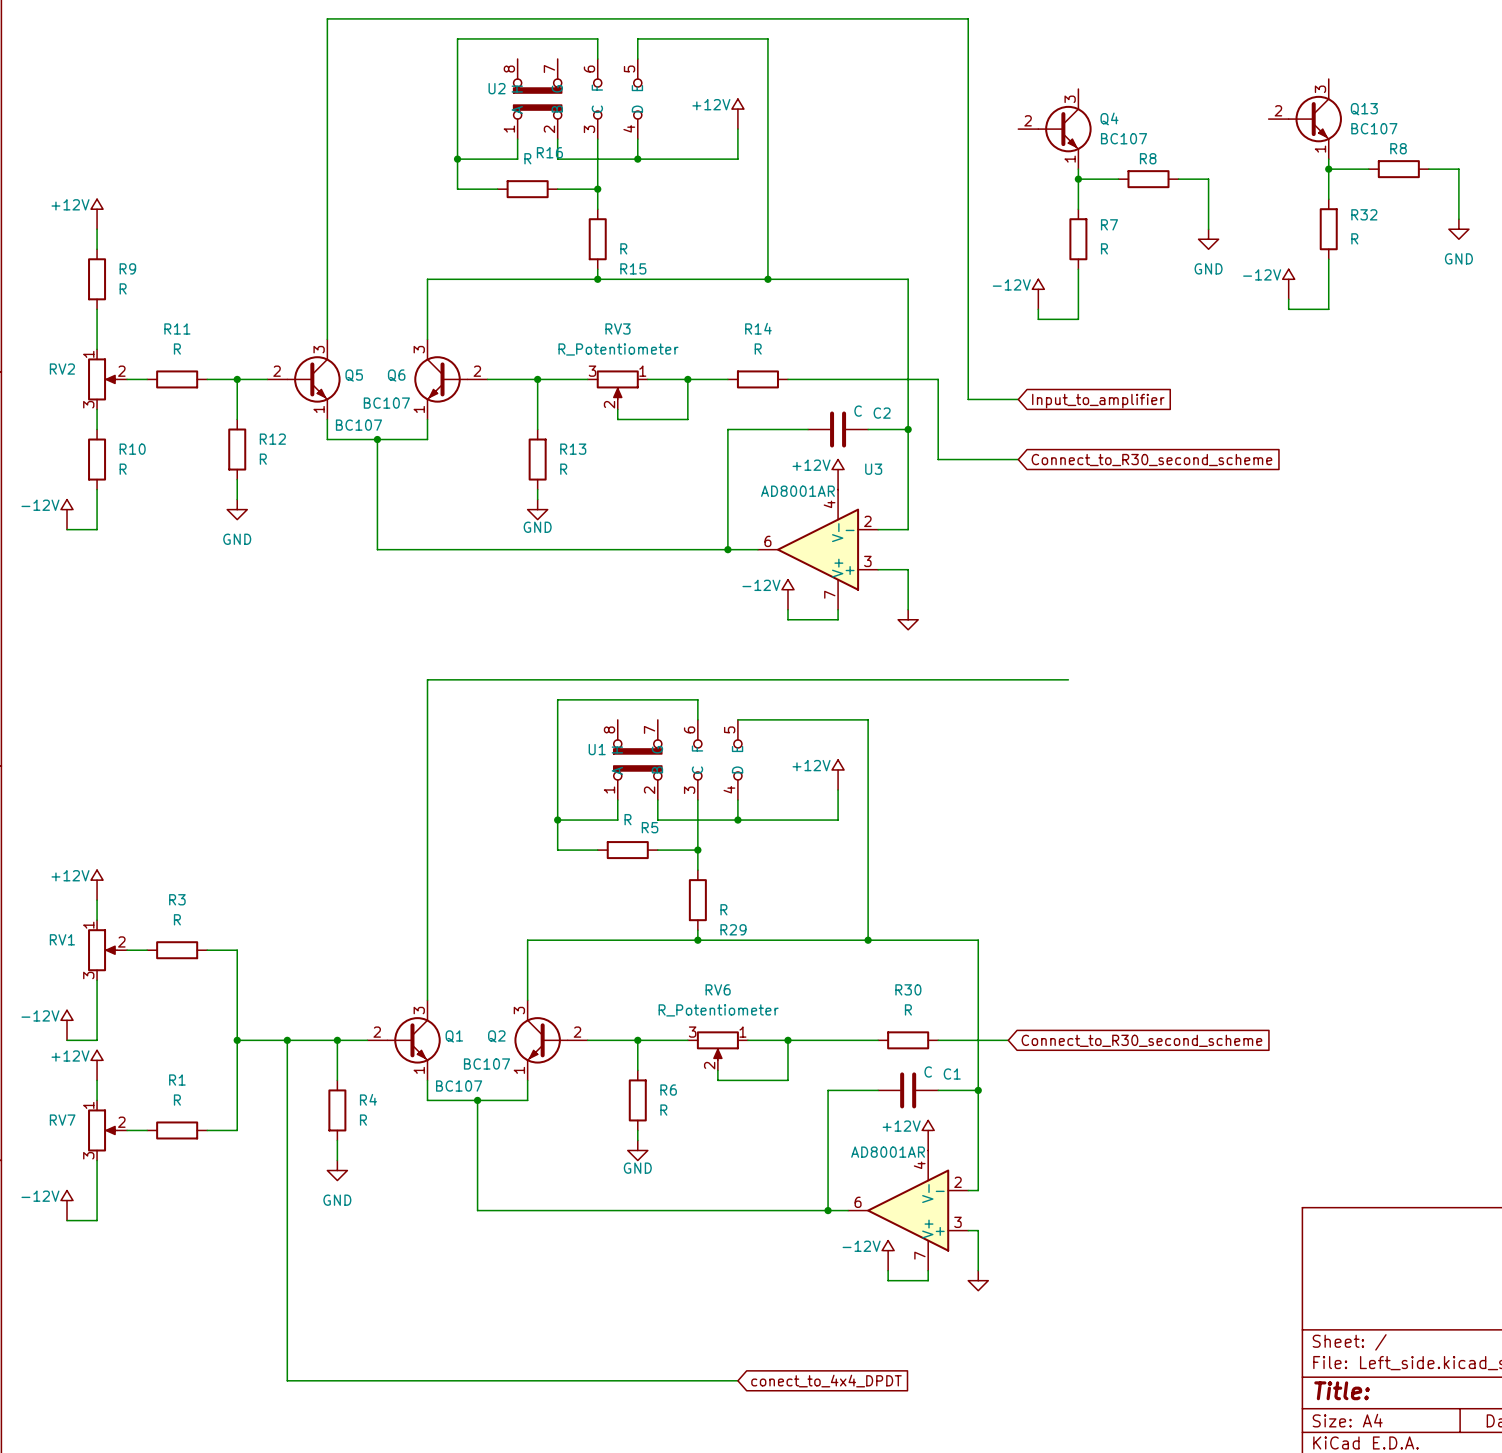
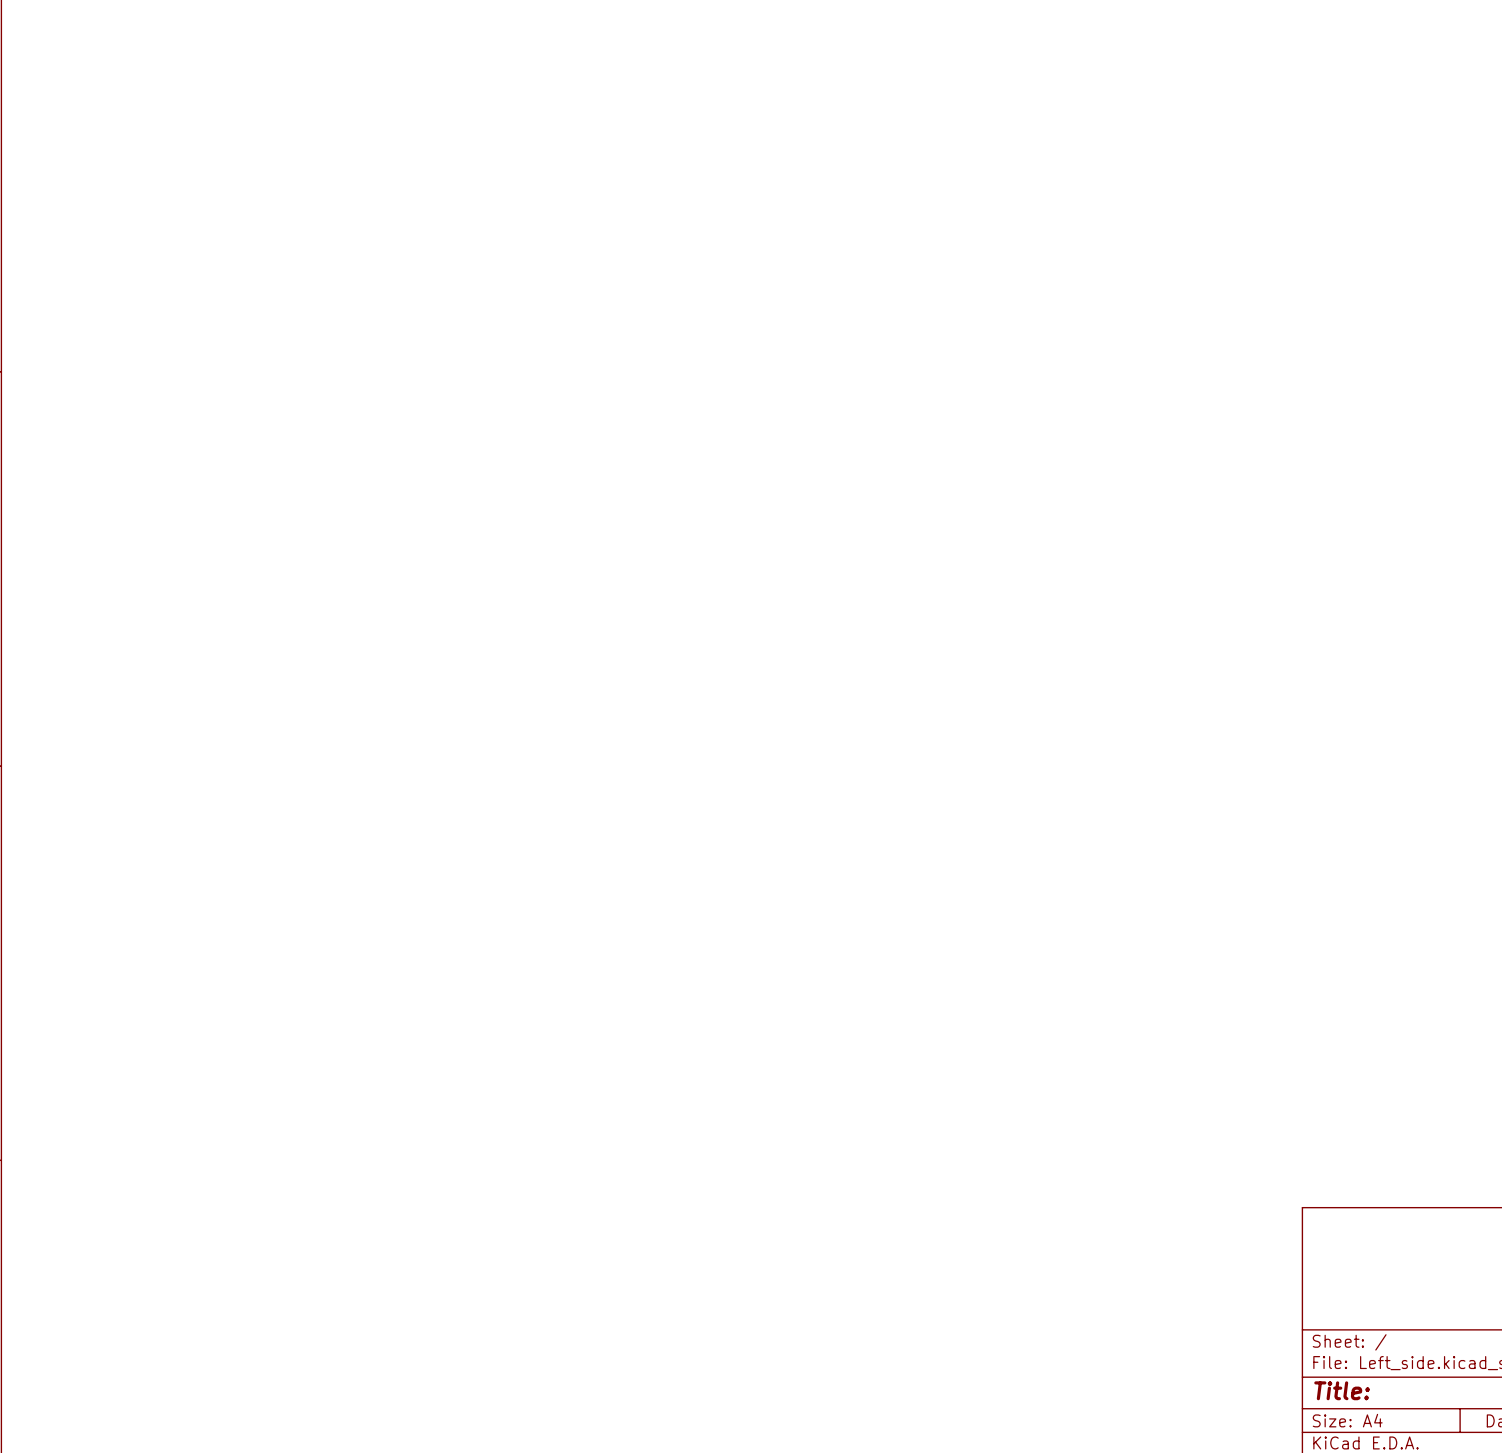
wire: (597, 58) (597, 38) (457, 38) (457, 189) (497, 189) -> none
wire: (637, 58) (637, 38) (767, 38) (767, 279) -> none
U2: (577, 99) -> none
part: +12V (737, 114) -> none
Q13: BC107 (1305, 119) -> none
wire: (737, 129) (737, 159) (557, 159) (557, 139) -> none
Q4: BC107 (1054, 129) -> none
wire: (517, 139) (517, 159) (457, 159) -> none
wire: (597, 139) (597, 209) -> none
wire: (637, 139) (637, 159) -> none
junction: (457, 159) -> none
junction: (637, 159) -> none
wire: (1328, 159) (1328, 199) -> none
wire: (1078, 169) (1078, 209) -> none
wire: (1328, 169) (1368, 169) -> none
junction: (1328, 169) -> none
part: R8 (1398, 169) -> none
wire: (1428, 169) (1458, 169) (1458, 219) -> none
wire: (1078, 179) (1118, 179) -> none
junction: (1078, 179) -> none
part: R8 (1148, 179) -> none
wire: (1178, 179) (1208, 179) (1208, 229) -> none
R16: R (527, 189) -> none
wire: (557, 189) (597, 189) -> none
junction: (597, 189) -> none
part: +12V (97, 214) -> none
wire: (97, 229) (97, 249) -> none
R32: R (1328, 229) -> none
power symbol: GND (1458, 229) -> none
R15: R (597, 239) -> none
R7: R (1078, 239) -> none
power symbol: GND (1208, 239) -> none
wire: (1328, 259) (1328, 309) (1288, 309) (1288, 299) -> none
wire: (597, 269) (597, 279) -> none
wire: (1078, 269) (1078, 319) (1038, 319) (1038, 309) -> none
R9: R (97, 279) -> none
junction: (597, 279) -> none
junction: (767, 279) -> none
part: -12V (1288, 284) -> none
part: -12V (1038, 294) -> none
wire: (97, 309) (97, 349) -> none
wire: (327, 339) (327, 18) (968, 18) (968, 399) (1018, 399) -> none
wire: (427, 339) (427, 279) (908, 279) (908, 529) (878, 529) -> none
RV2: (107, 379) -> none
wire: (127, 379) (147, 379) -> none
R11: R (177, 379) -> none
wire: (207, 379) (267, 379) -> none
wire: (237, 379) (237, 419) -> none
junction: (237, 379) -> none
Q5: BC107 (303, 379) -> none
Q6: BC107 (450, 379) -> none
wire: (487, 379) (587, 379) -> none
wire: (537, 379) (537, 429) -> none
junction: (537, 379) -> none
wire: (647, 379) (727, 379) -> none
wire: (687, 379) (687, 419) (617, 419) (617, 409) -> none
junction: (687, 379) -> none
R14: R (757, 379) -> none
wire: (787, 379) (938, 379) (938, 459) (1018, 459) -> none
RV3: R_Potentiometer (617, 389) -> none
global label: Input_to_amplifier (1098, 401) -> none
wire: (97, 409) (97, 429) -> none
wire: (327, 419) (327, 439) (427, 439) (427, 419) -> none
wire: (808, 429) (727, 429) (727, 549) -> none
C2: C (838, 429) -> none
wire: (868, 429) (908, 429) -> none
junction: (908, 429) -> none
wire: (377, 439) (377, 549) (757, 549) -> none
junction: (377, 439) -> none
R12: R (237, 449) -> none
R10: R (97, 459) -> none
R13: R (537, 459) -> none
global label: Connect_to_R30_second_scheme (1151, 460) -> none
part: +12V (838, 474) -> none
wire: (237, 479) (237, 499) -> none
wire: (97, 489) (97, 529) (67, 529) -> none
wire: (537, 489) (537, 499) -> none
power symbol: GND (237, 509) -> none
power symbol: GND (537, 509) -> none
part: -12V (67, 514) -> none
junction: (727, 549) -> none
U3: AD8001AR (818, 549) -> none
wire: (878, 569) (908, 569) (908, 609) -> none
part: -12V (787, 594) -> none
wire: (787, 609) (787, 619) (838, 619) (838, 609) -> none
power symbol: (908, 619) -> none
wire: (1068, 679) (427, 679) (427, 1000) -> none
wire: (697, 719) (697, 699) (557, 699) (557, 850) (597, 850) -> none
wire: (737, 719) (868, 719) (868, 940) -> none
U1: (677, 759) -> none
part: +12V (838, 774) -> none
wire: (838, 789) (838, 820) (657, 820) (657, 800) -> none
wire: (617, 800) (617, 820) (557, 820) -> none
wire: (697, 800) (697, 870) -> none
wire: (737, 800) (737, 820) -> none
junction: (557, 820) -> none
junction: (737, 820) -> none
R5: R (627, 850) -> none
wire: (657, 850) (697, 850) -> none
junction: (697, 850) -> none
part: +12V (97, 885) -> none
wire: (97, 900) (97, 920) -> none
R29: R (697, 900) -> none
wire: (697, 930) (697, 940) -> none
junction: (697, 940) -> none
junction: (868, 940) -> none
RV1: (107, 950) -> none
wire: (127, 950) (147, 950) -> none
R3: R (177, 950) -> none
wire: (207, 950) (237, 950) (237, 1130) (207, 1130) -> none
wire: (97, 980) (97, 1040) (67, 1040) -> none
wire: (527, 1000) (527, 940) (978, 940) (978, 1190) (968, 1190) -> none
part: -12V (67, 1025) -> none
wire: (237, 1040) (367, 1040) -> none
junction: (237, 1040) -> none
wire: (287, 1040) (287, 1380) (737, 1380) -> none
junction: (287, 1040) -> none
wire: (337, 1040) (337, 1080) -> none
junction: (337, 1040) -> none
Q1: BC107 (404, 1040) -> none
Q2: BC107 (551, 1040) -> none
wire: (587, 1040) (687, 1040) -> none
wire: (637, 1040) (637, 1070) -> none
junction: (637, 1040) -> none
wire: (747, 1040) (878, 1040) -> none
wire: (787, 1040) (787, 1080) (717, 1080) (717, 1070) -> none
junction: (787, 1040) -> none
R30: R (908, 1040) -> none
wire: (938, 1040) (1008, 1040) -> none
global label: Connect_to_R30_second_scheme (1141, 1040) -> none
RV6: R_Potentiometer (717, 1050) -> none
part: +12V (97, 1065) -> none
wire: (97, 1080) (97, 1100) -> none
wire: (427, 1080) (427, 1100) (527, 1100) (527, 1080) -> none
wire: (878, 1090) (828, 1090) (828, 1210) -> none
C1: C (908, 1090) -> none
wire: (938, 1090) (978, 1090) -> none
junction: (978, 1090) -> none
wire: (477, 1100) (477, 1210) (848, 1210) -> none
junction: (477, 1100) -> none
R6: R (637, 1100) -> none
R4: R (337, 1110) -> none
RV7: (107, 1130) -> none
wire: (127, 1130) (147, 1130) -> none
R1: R (177, 1130) -> none
wire: (637, 1130) (637, 1140) -> none
part: +12V (928, 1135) -> none
wire: (337, 1140) (337, 1160) -> none
power symbol: GND (637, 1150) -> none
wire: (97, 1160) (97, 1220) (67, 1220) -> none
power symbol: GND (337, 1170) -> none
part: -12V (67, 1205) -> none
junction: (828, 1210) -> none
part: AD8001AR (908, 1210) -> none
wire: (968, 1230) (978, 1230) (978, 1270) -> none
part: -12V (888, 1255) -> none
wire: (888, 1270) (888, 1280) (928, 1280) (928, 1270) -> none
power symbol: (978, 1280) -> none
global label: conect_to_4x4_DPDT (826, 1381) -> none

